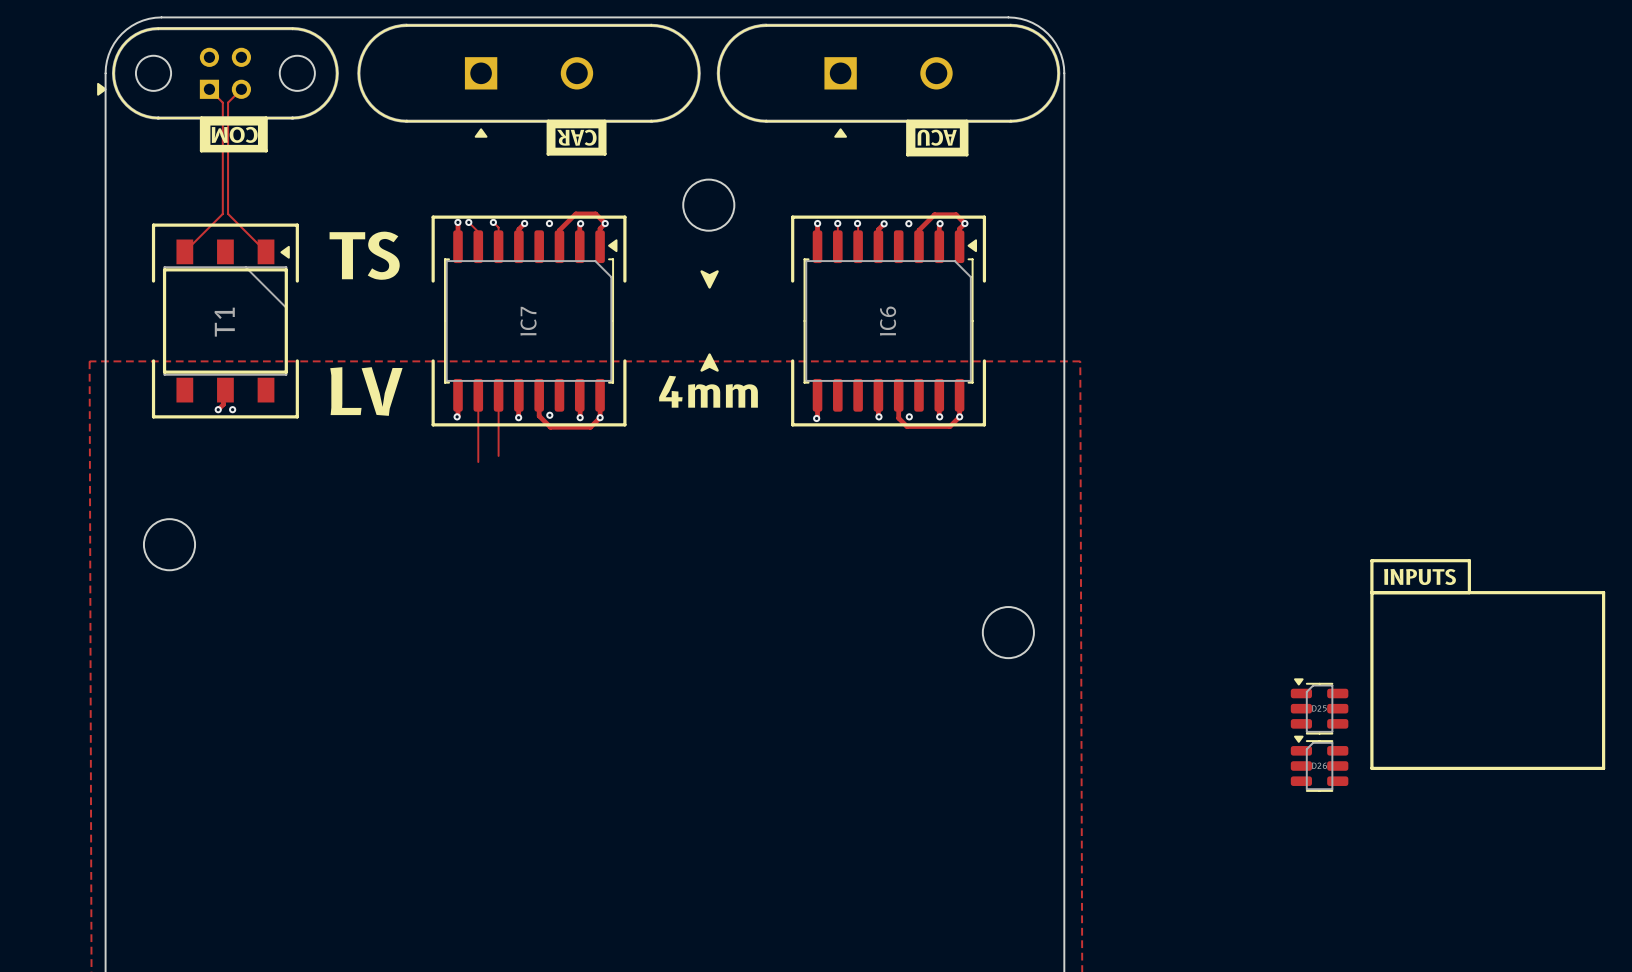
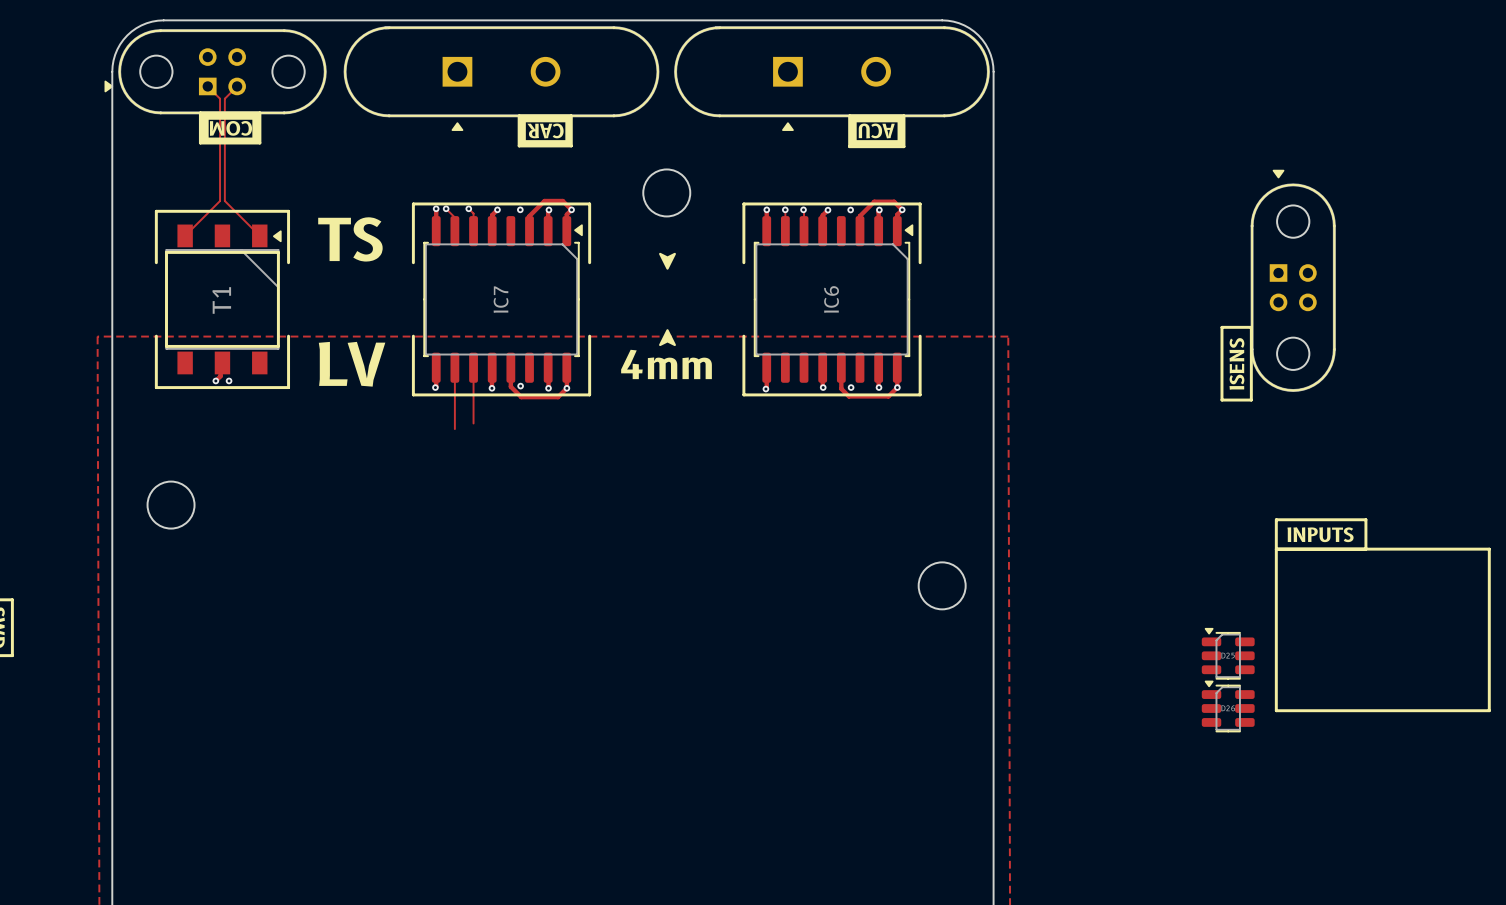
part: none -> (1293, 280)
line: none -> (1221, 327) (1251, 327) (1251, 400) (1221, 400) (1221, 327)
text: none -> ISENS (1236, 363)

